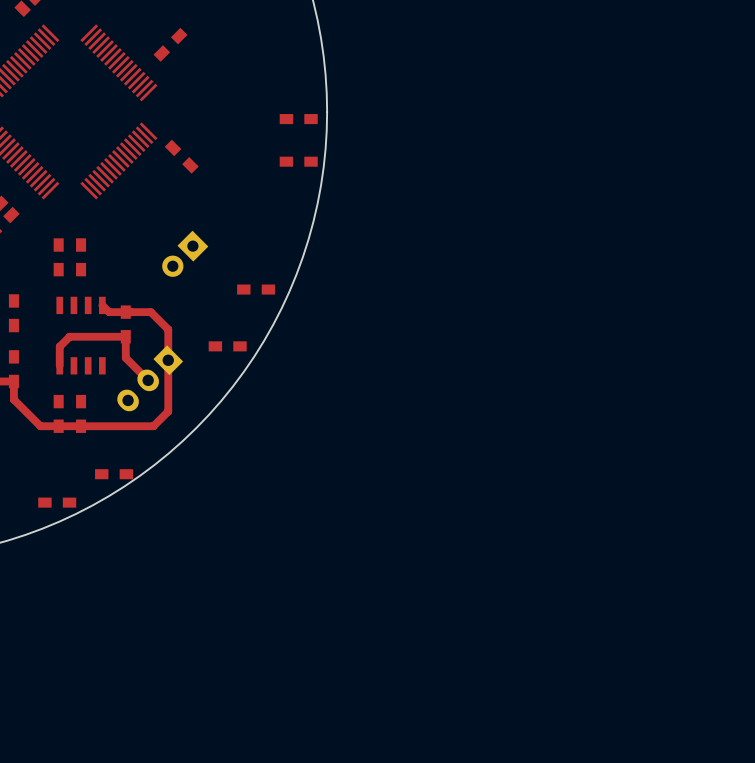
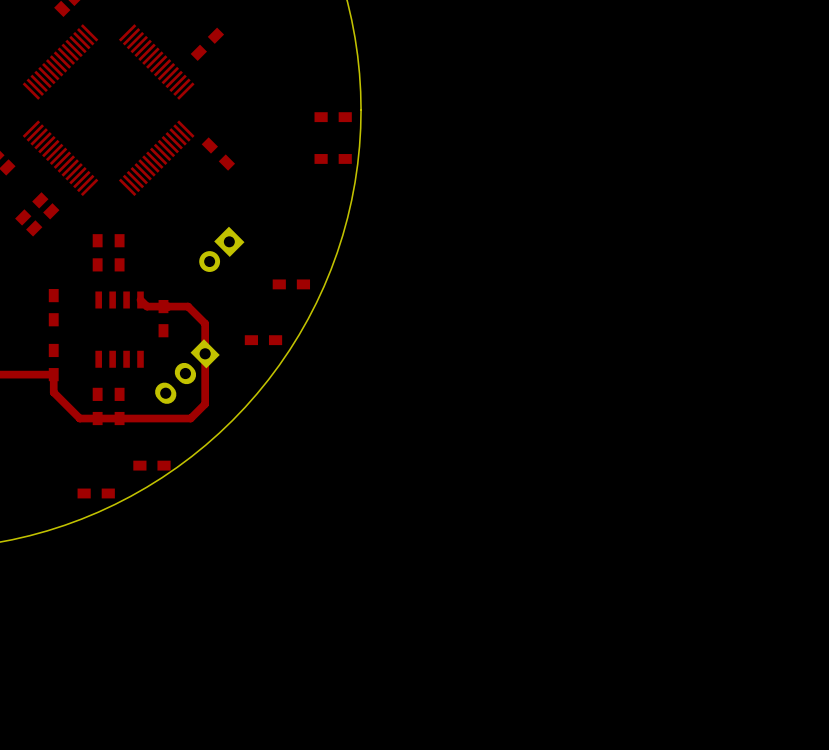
top track: (59, 365) (59, 346) (69, 336) (125, 336) (125, 357) (148, 380) -> none

